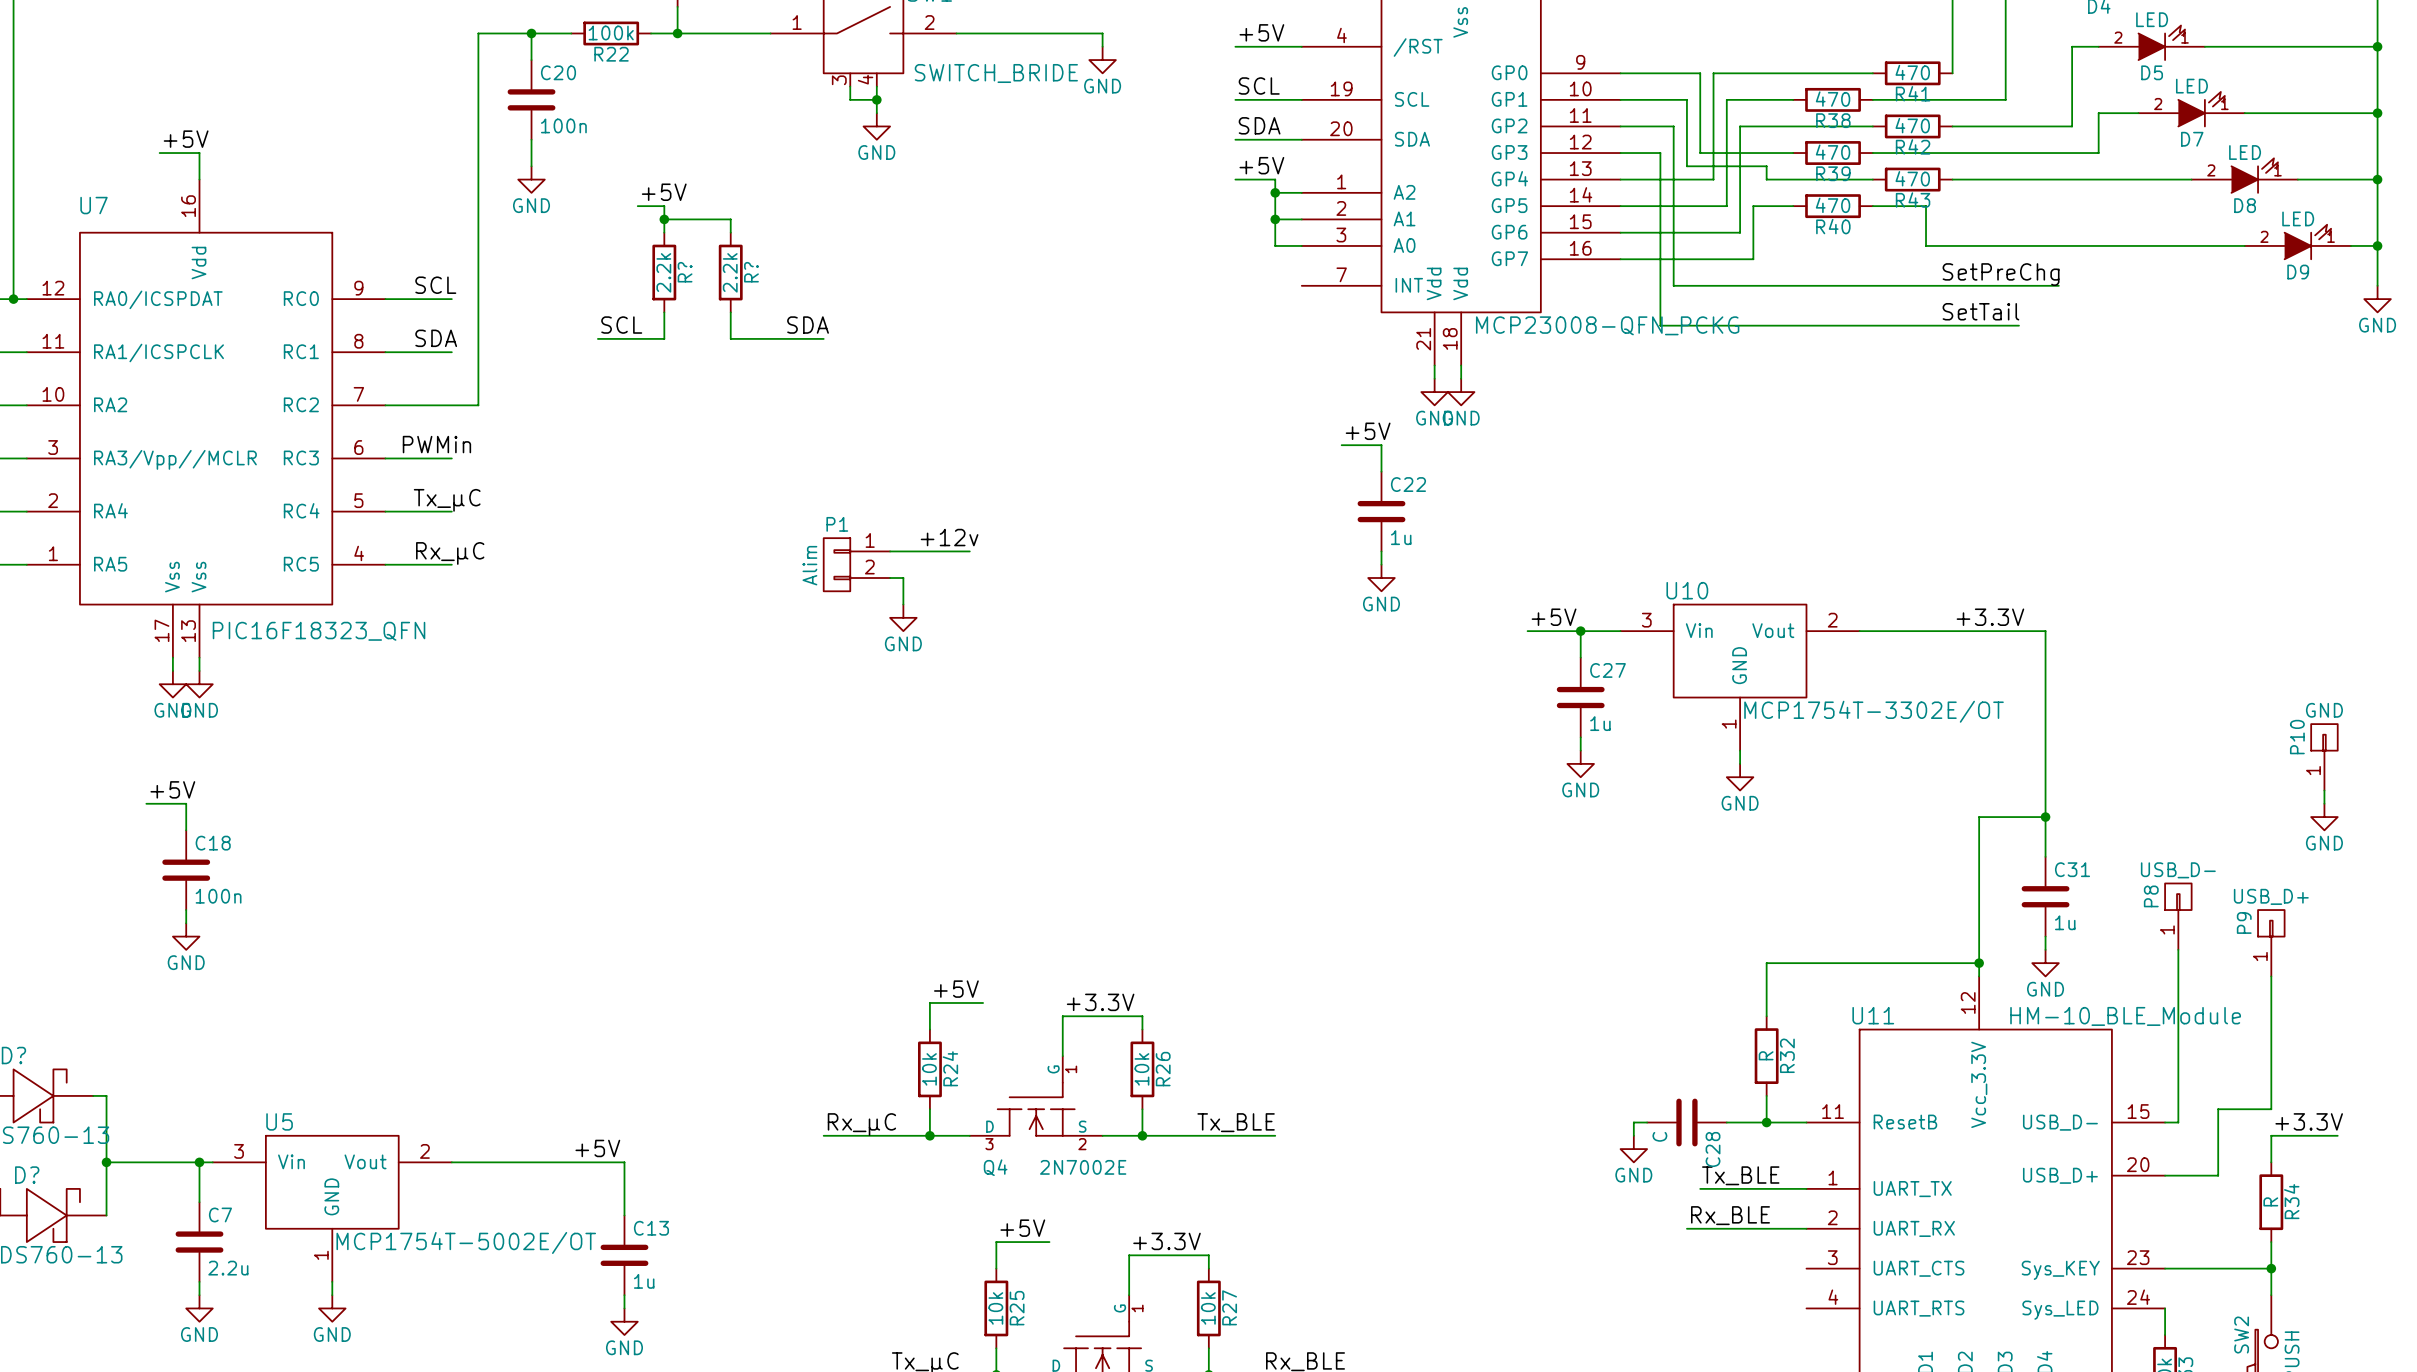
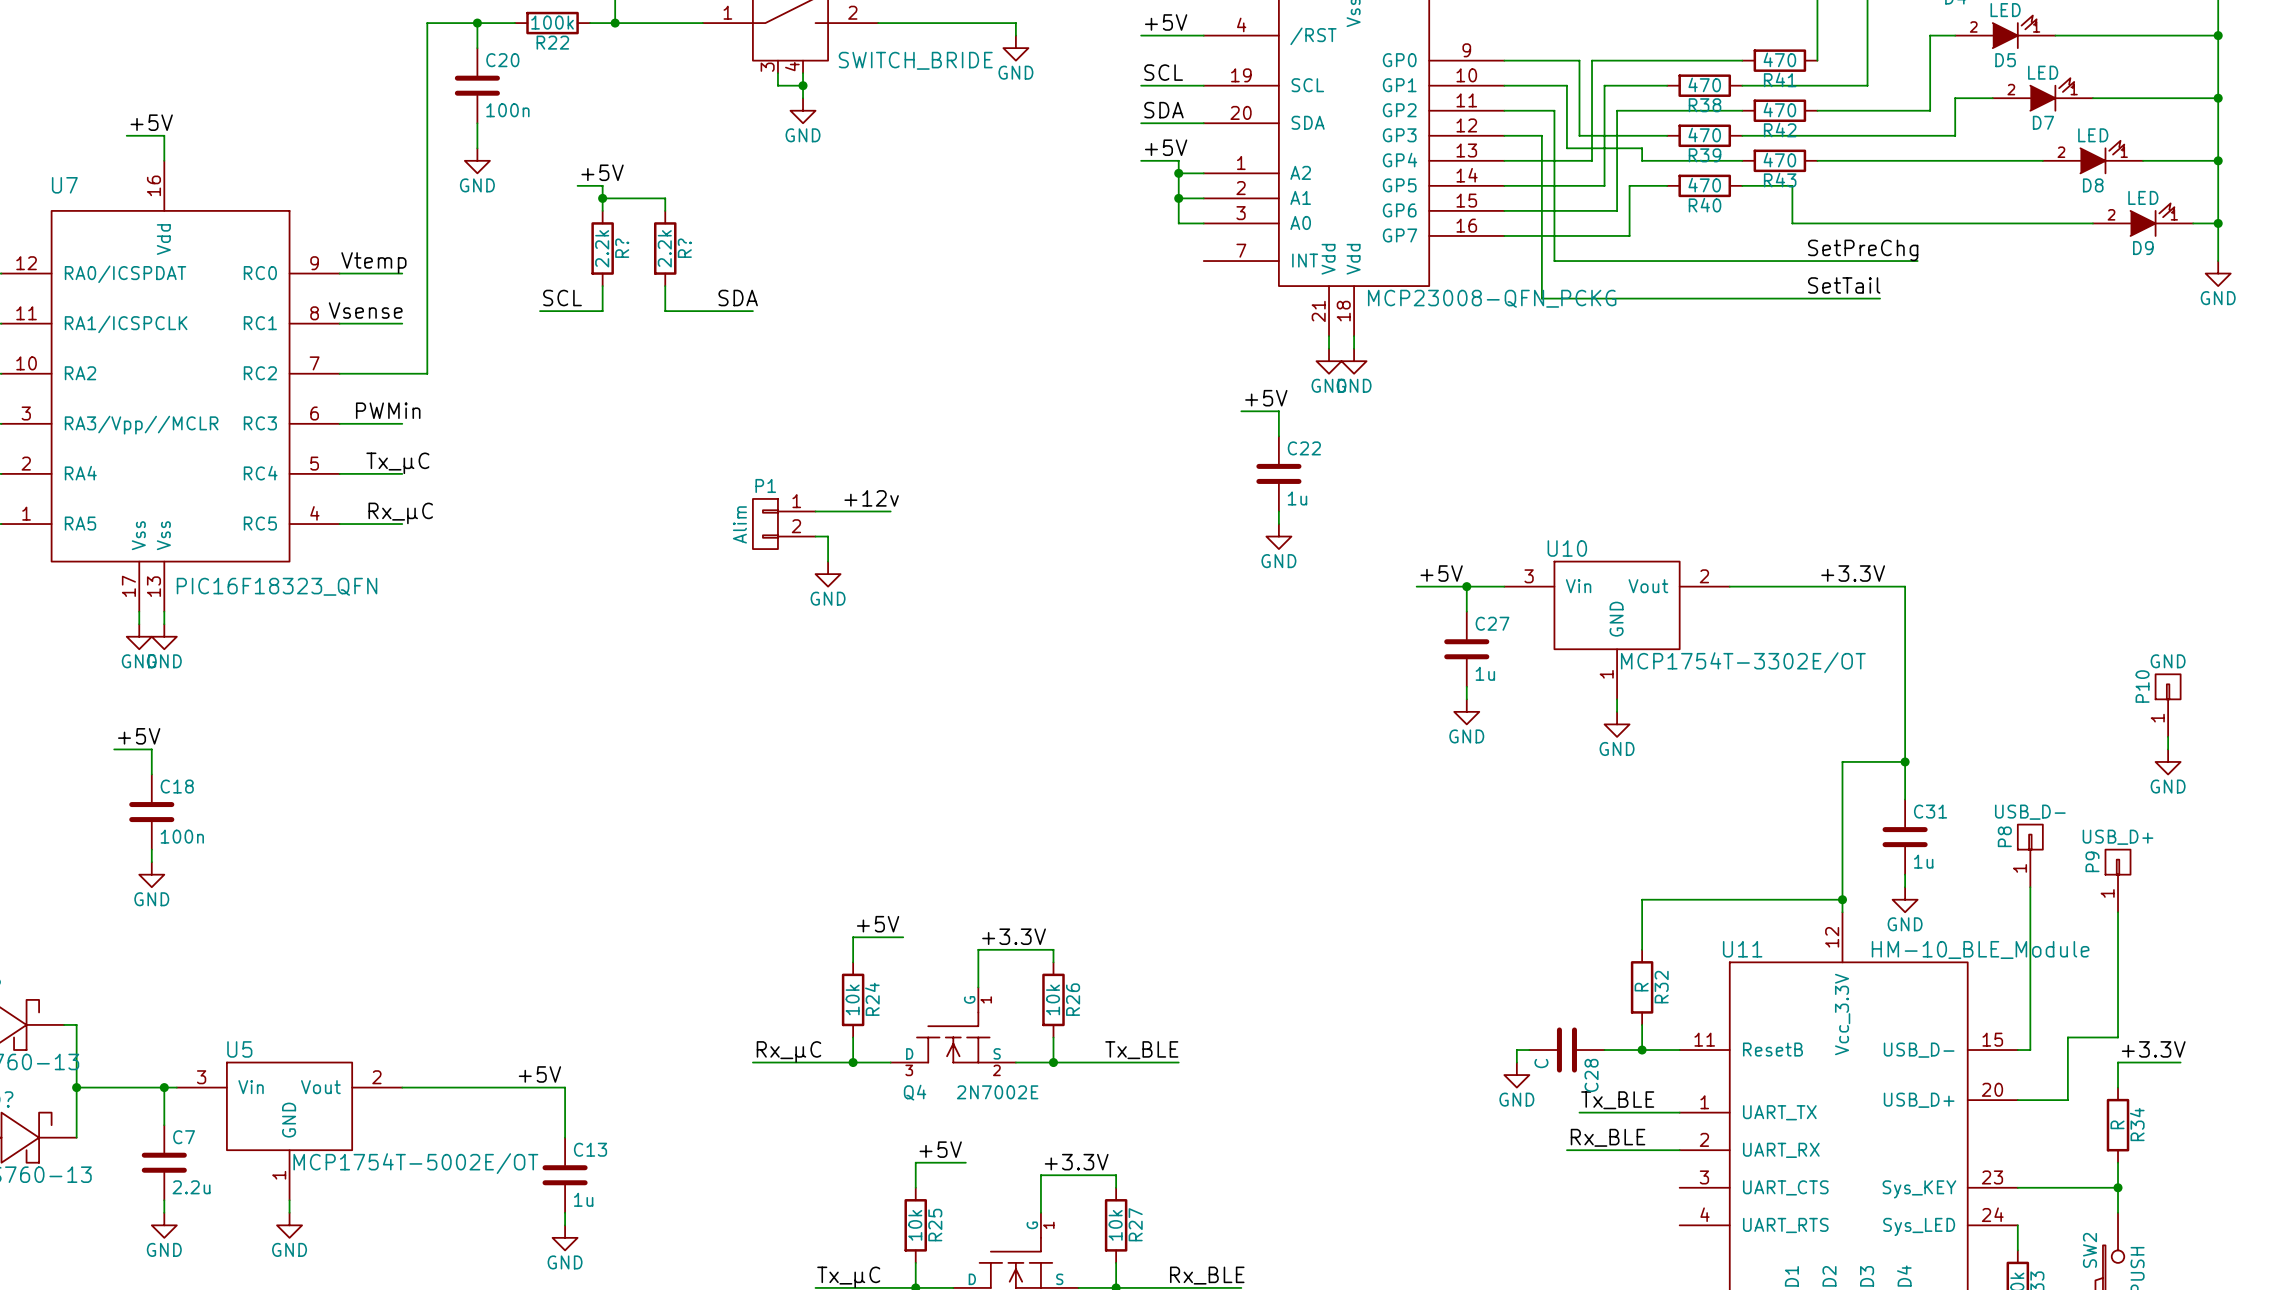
label: SCL (435, 285) -> none
label: none -> Vtemp (373, 262)
label: none -> Vsense (365, 310)
label: SDA (436, 338) -> none

